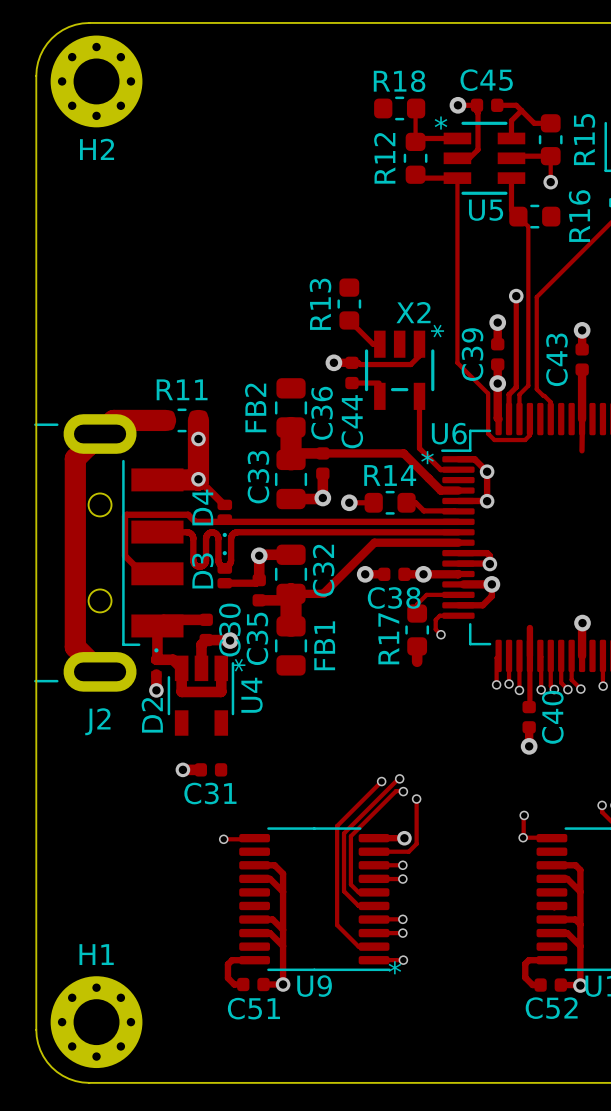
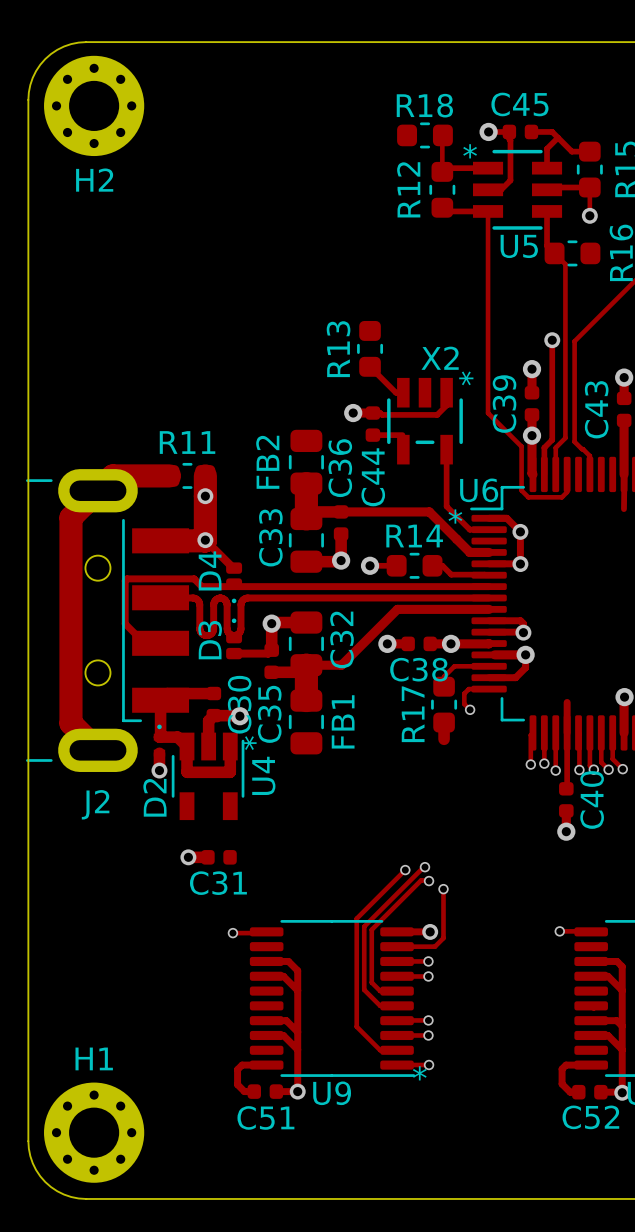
via: (524, 815) -> none
track: (523, 816) (523, 837) -> none

